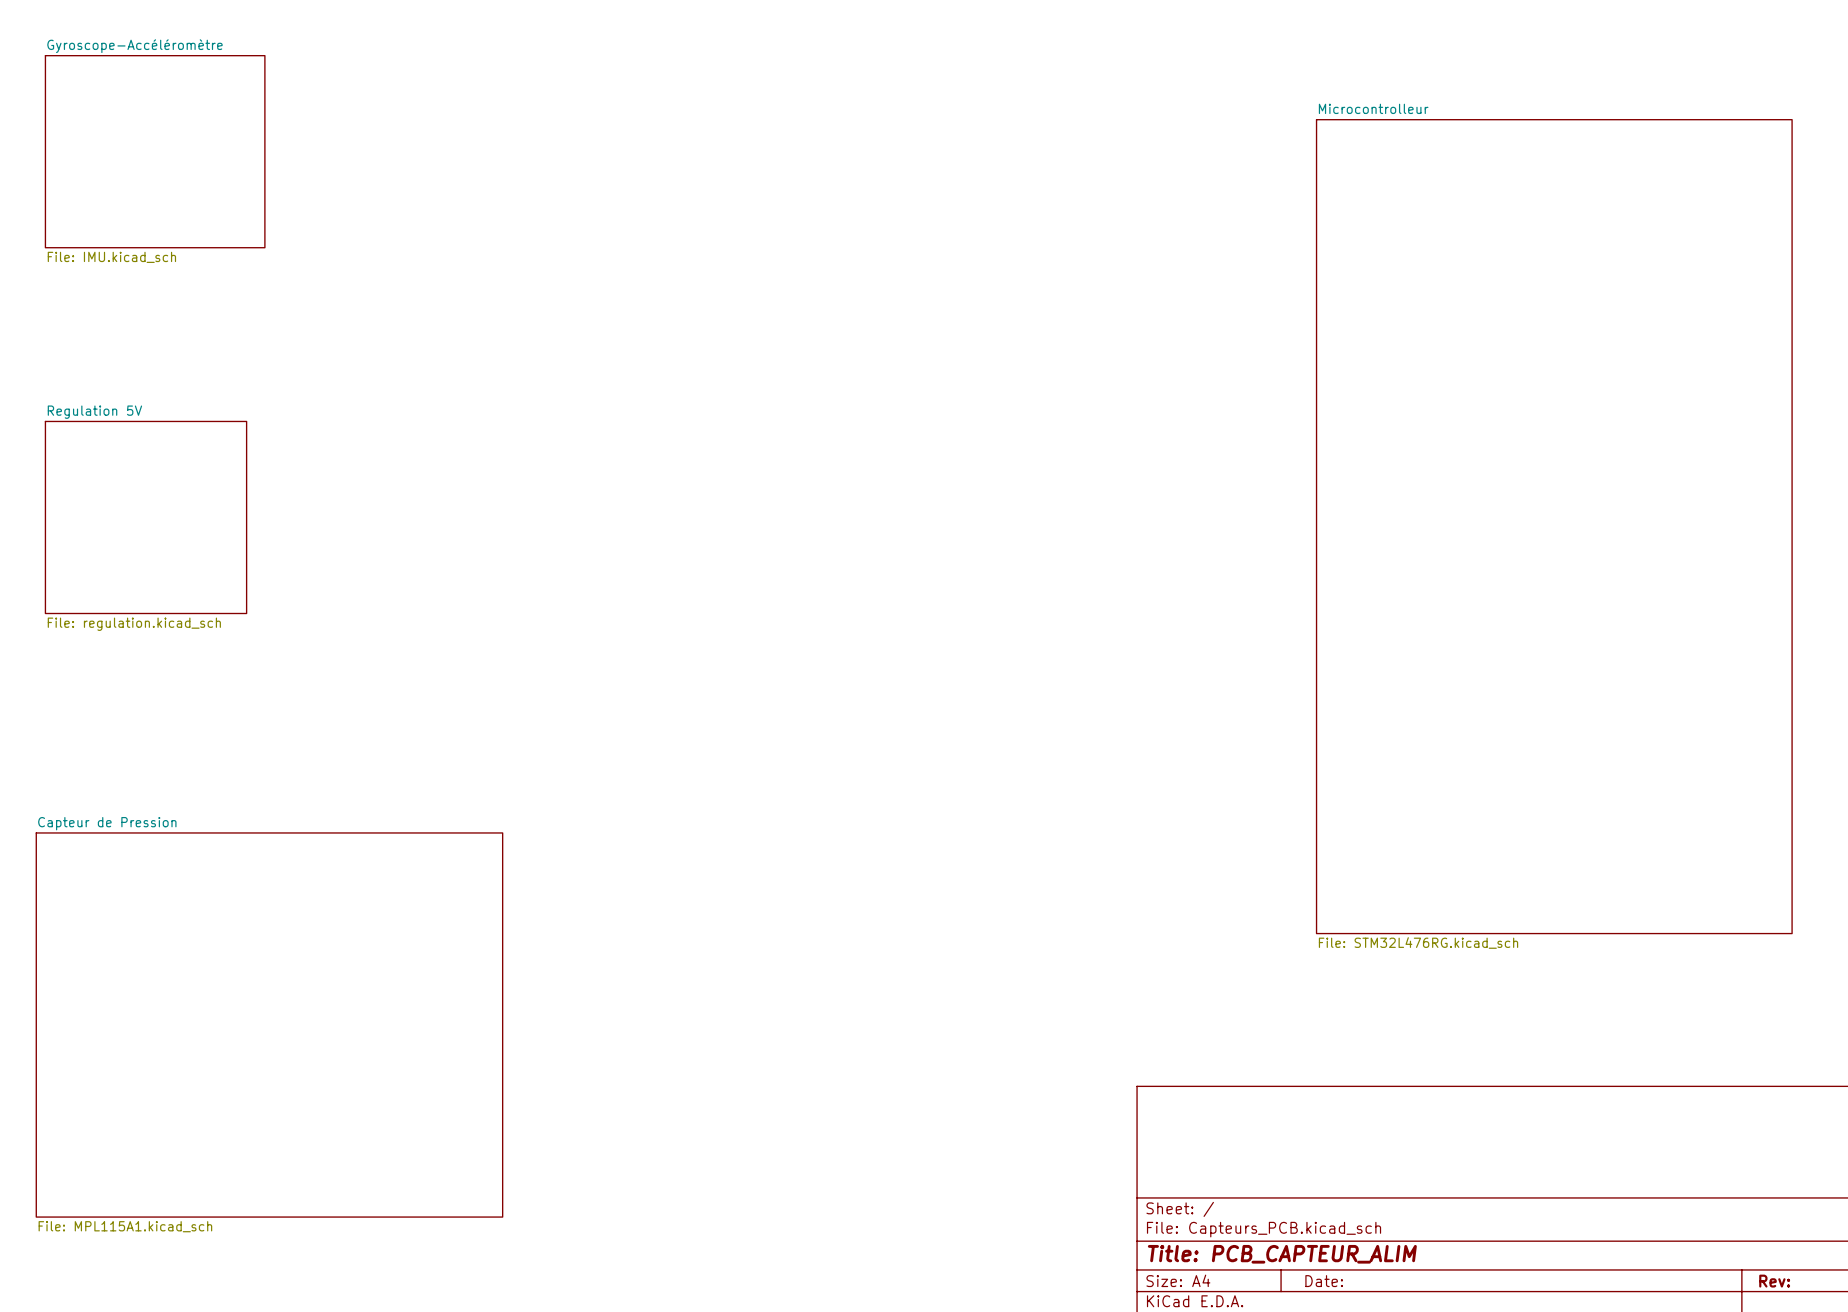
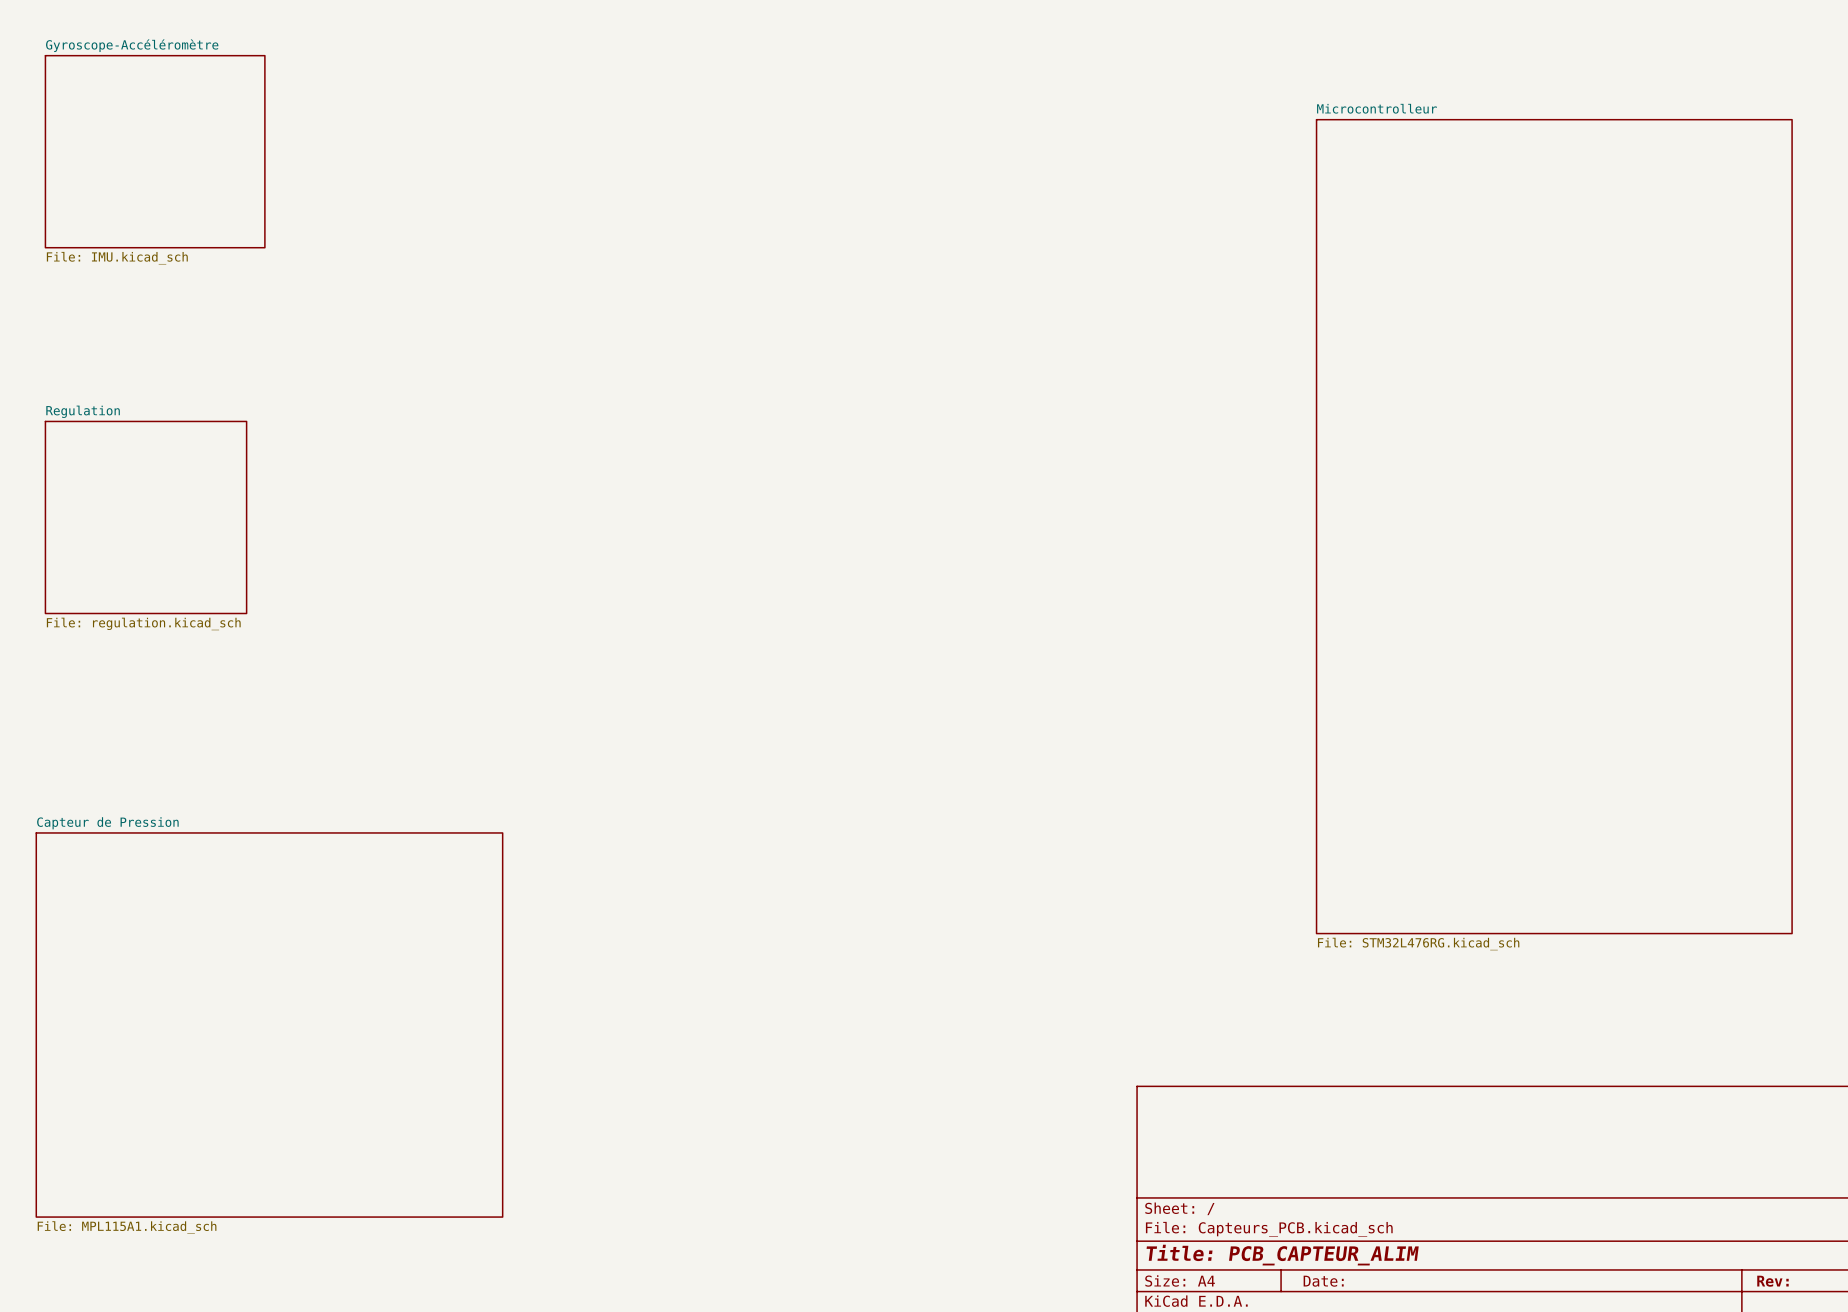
sheet Regulation 5V name: Regulation 5V (94, 412) -> Regulation (83, 411)

